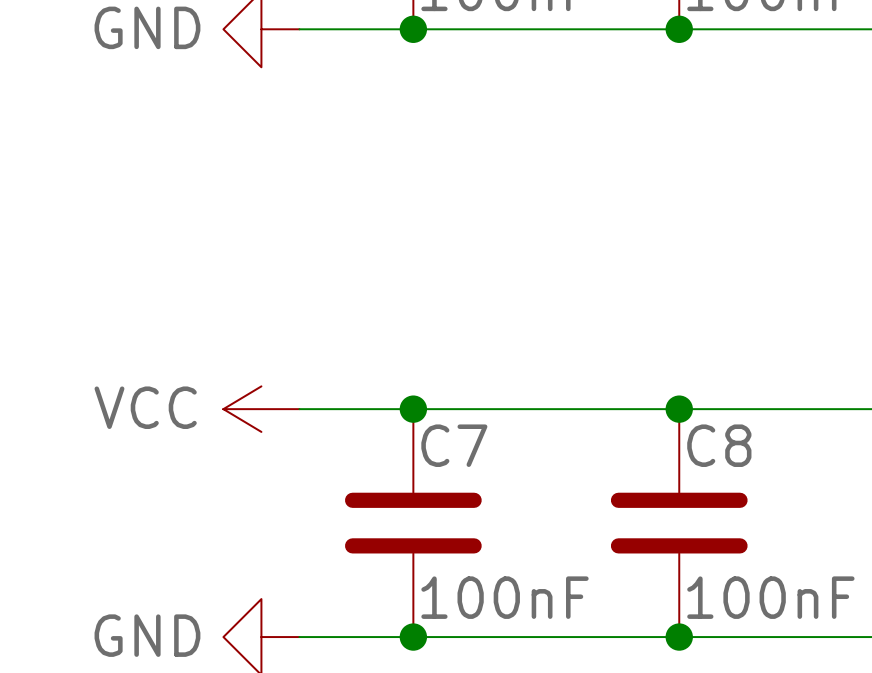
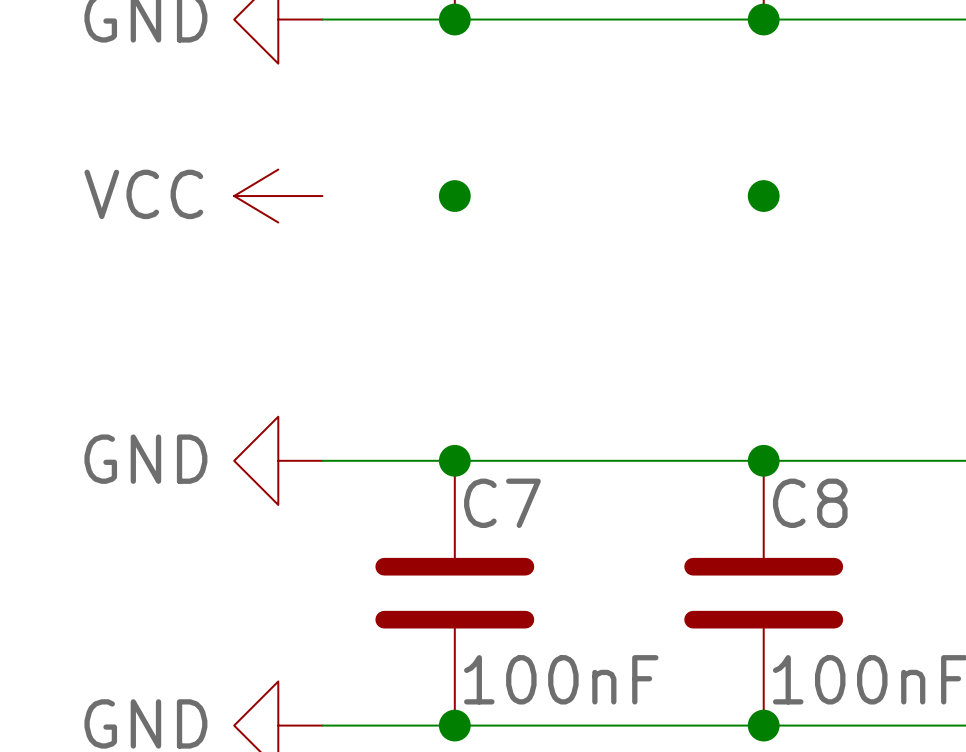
power symbol: none -> VCC (278, 196)
junction: none -> (454, 196)
junction: none -> (763, 196)
power symbol: VCC (261, 409) -> GND (278, 460)

